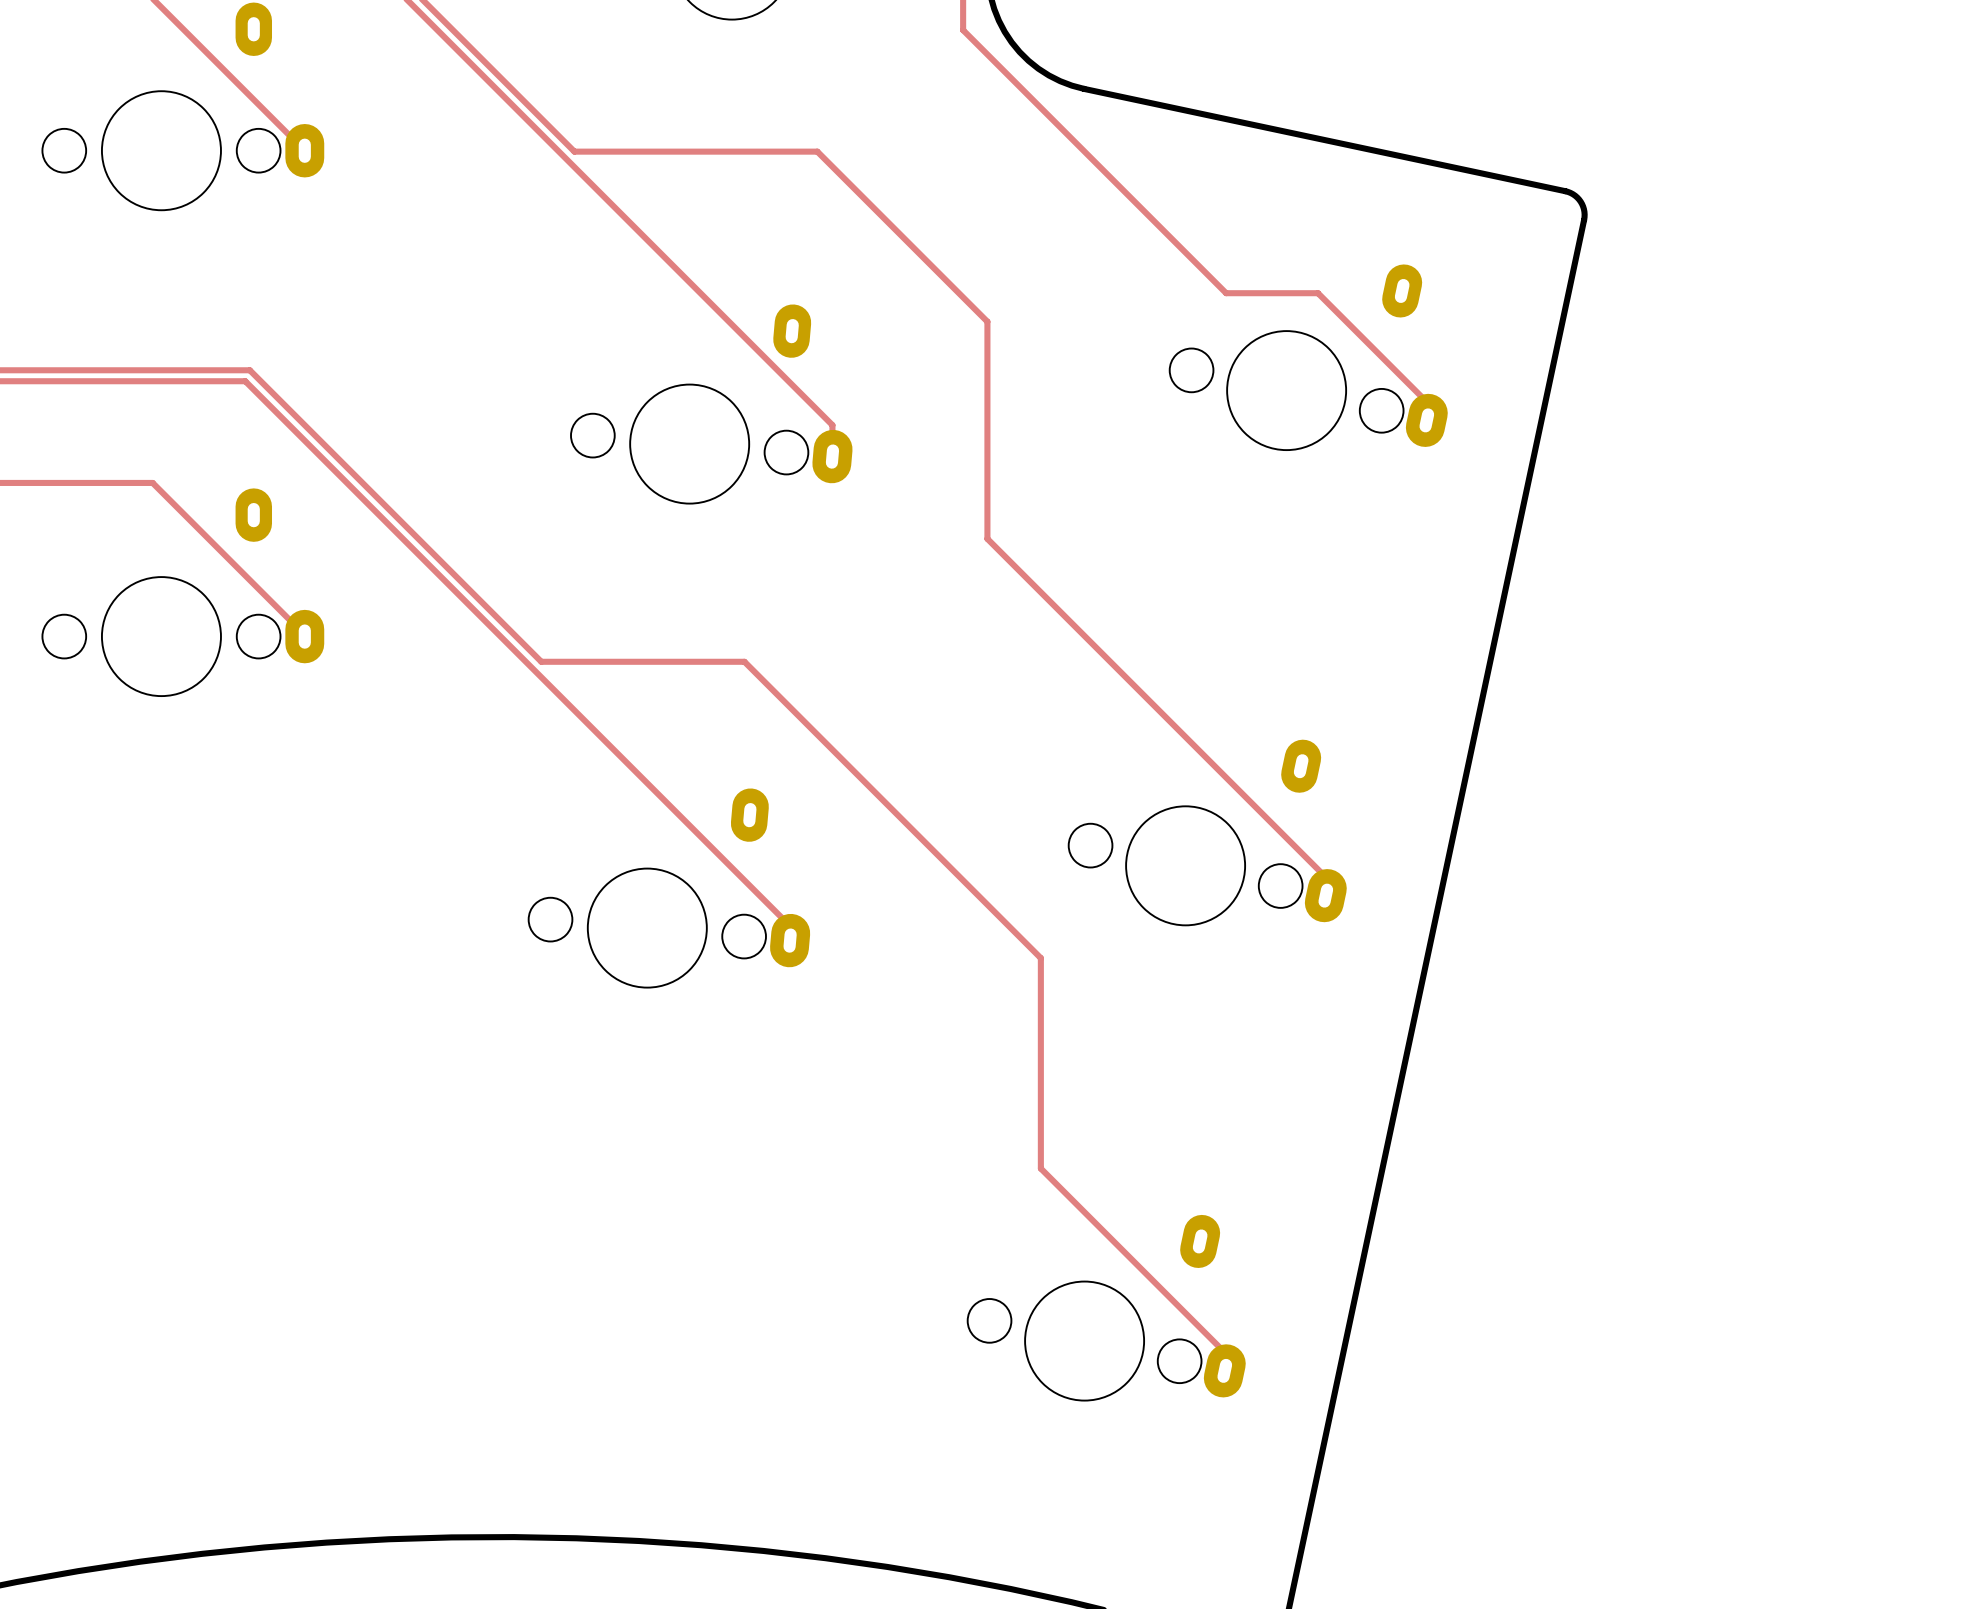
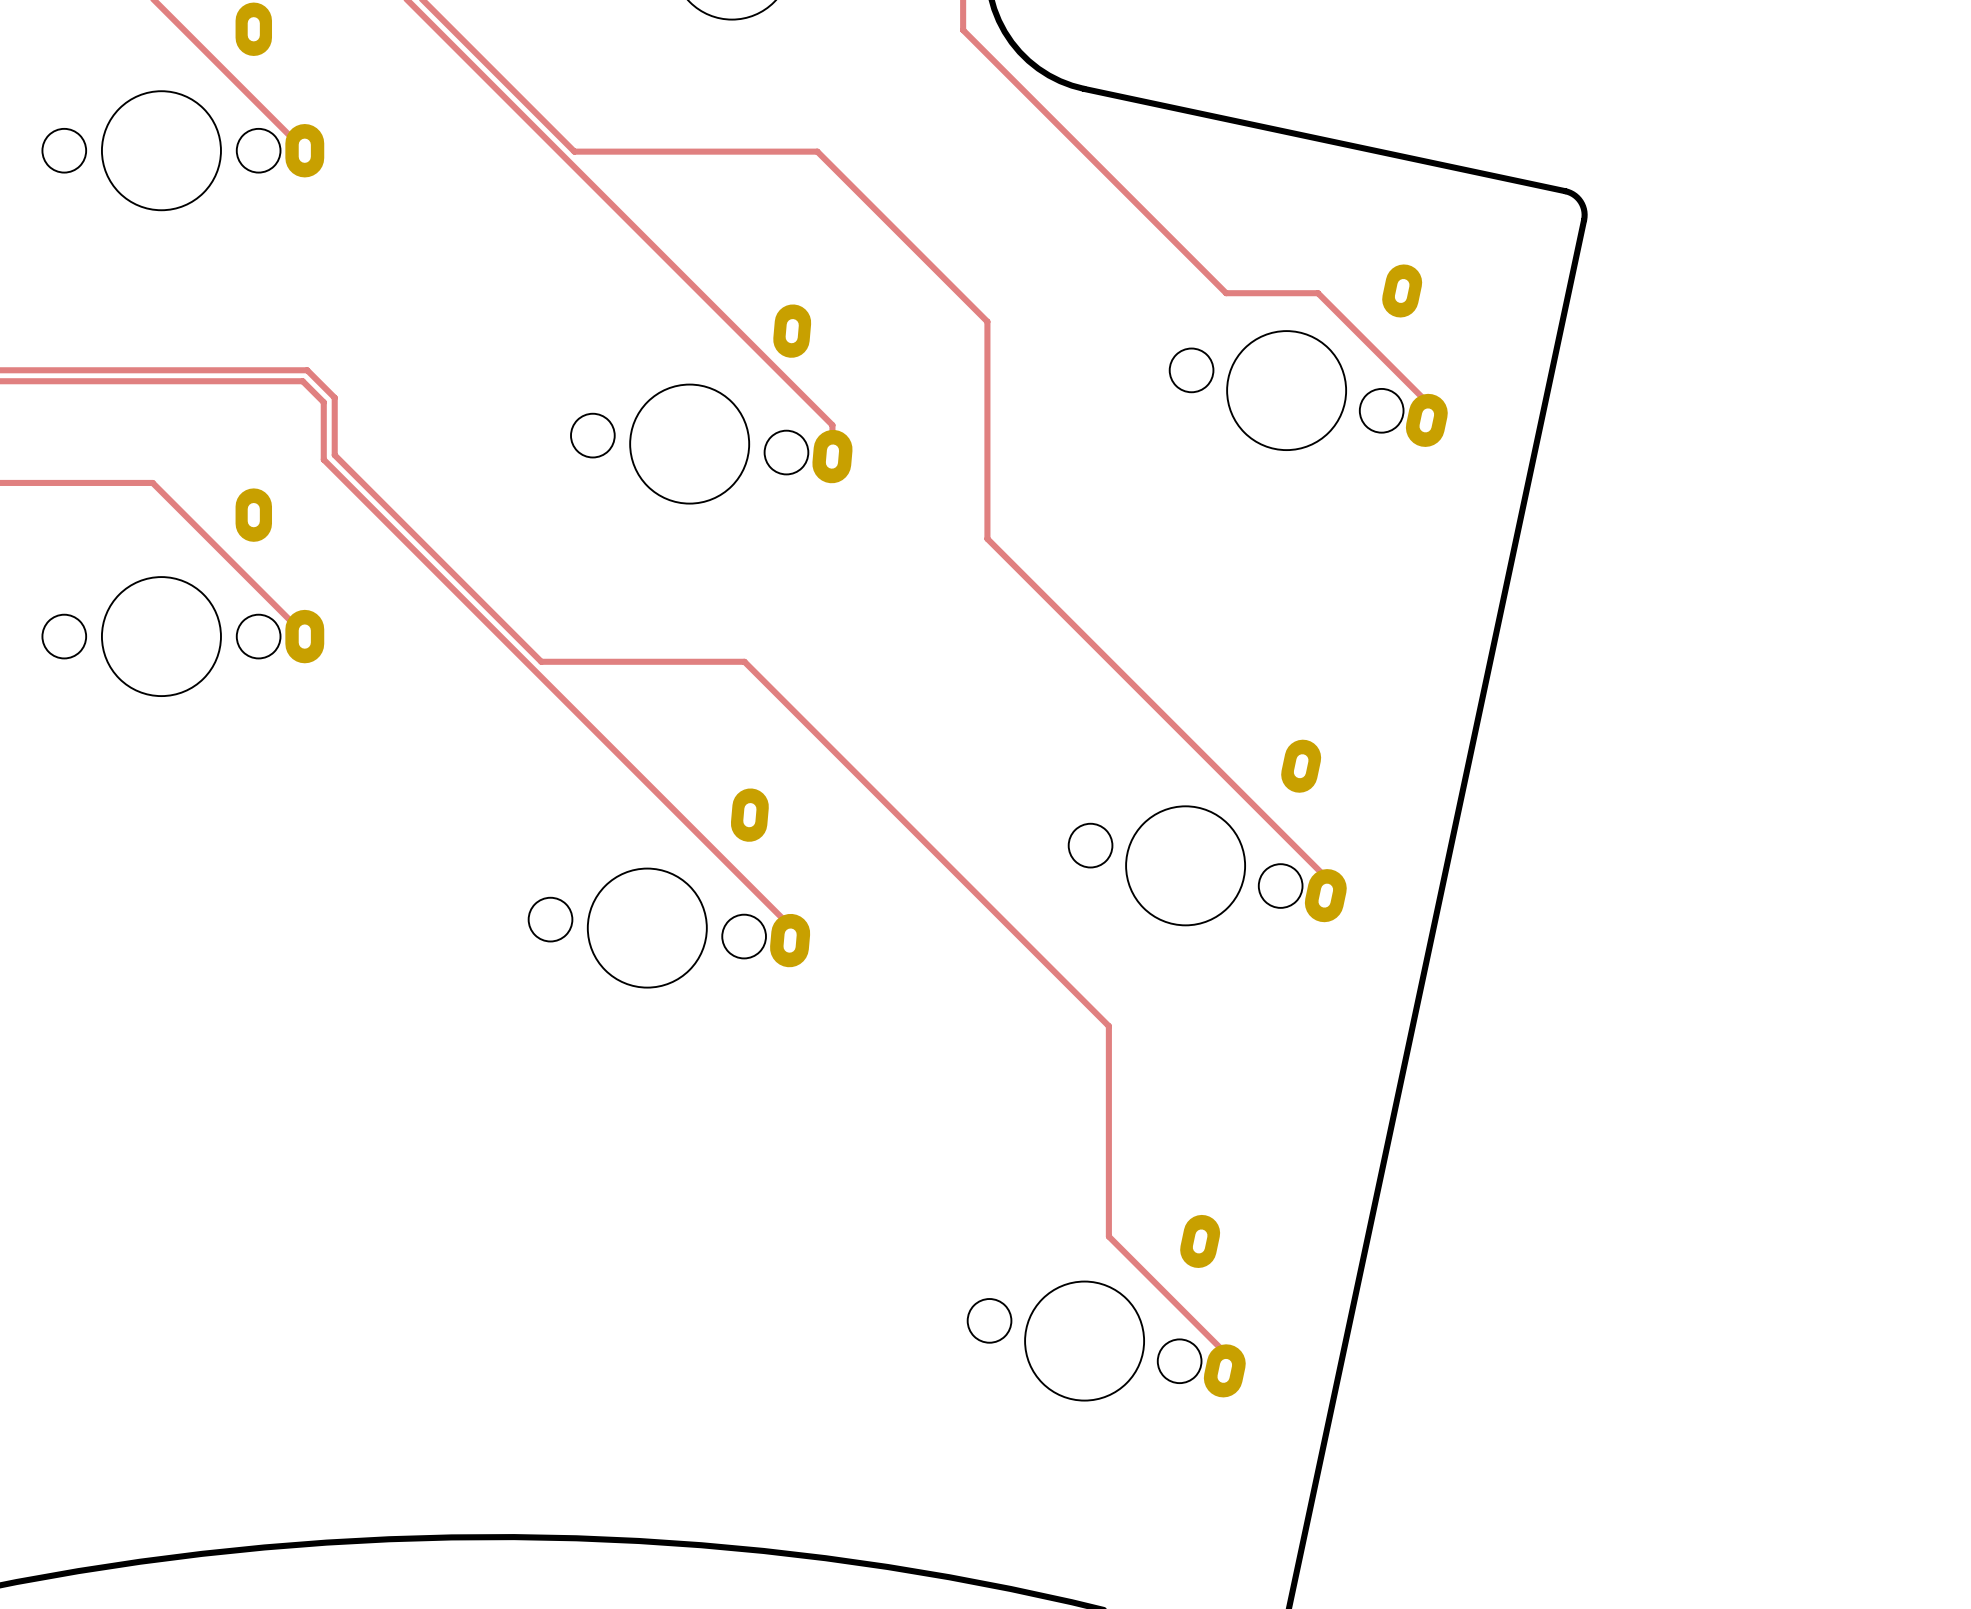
top track: (249, 370) (334, 455) -> (249, 370) (307, 370) (334, 397) (334, 455)
top track: (245, 381) (323, 459) -> (245, 381) (302, 381) (323, 402) (323, 459)
top track: (1040, 958) (1040, 1168) (1108, 1236) -> (1040, 958) (1108, 1026) (1108, 1236)

